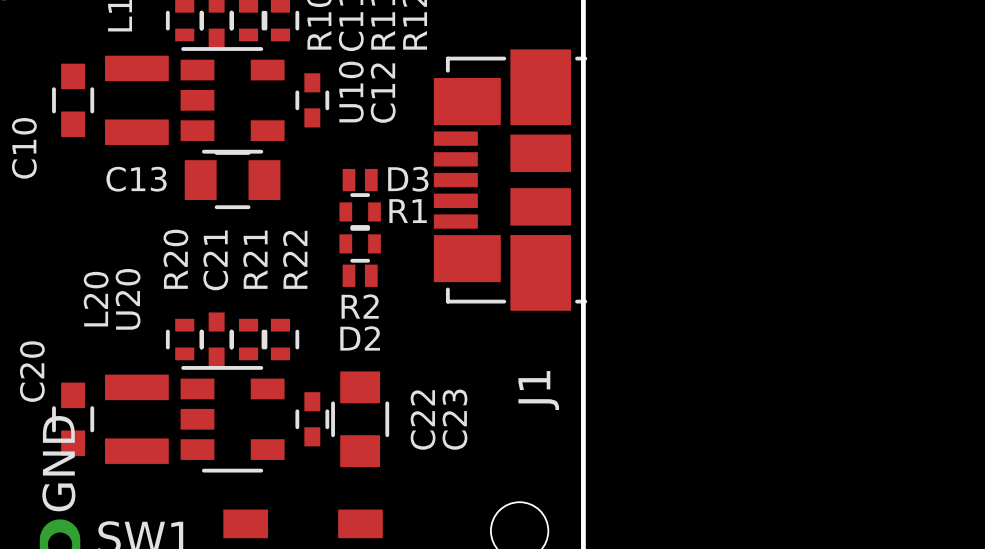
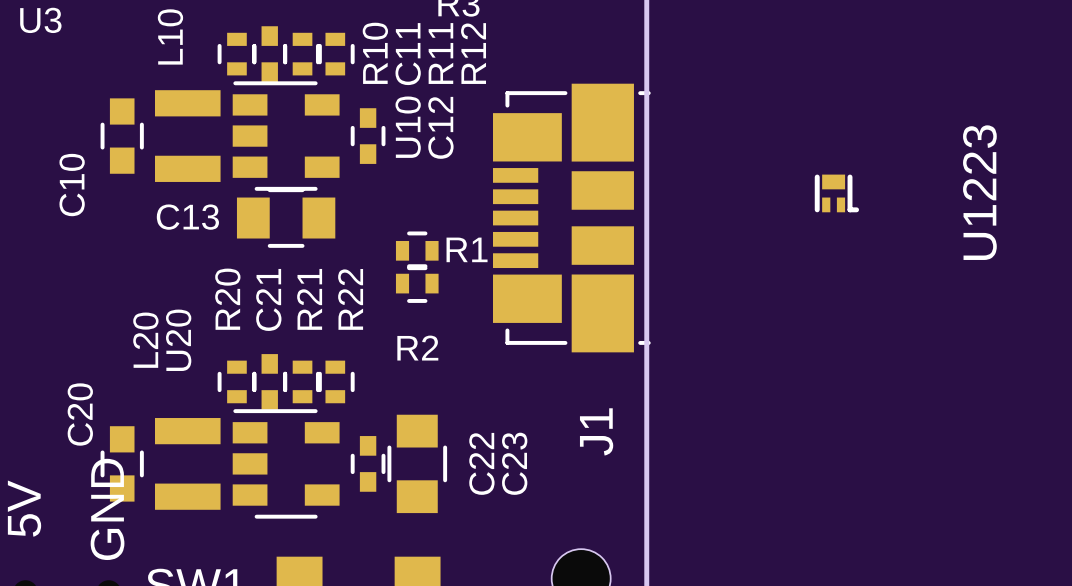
U1223: none -> (836, 193)
D3: (360, 180) -> none
D2: (360, 275) -> none

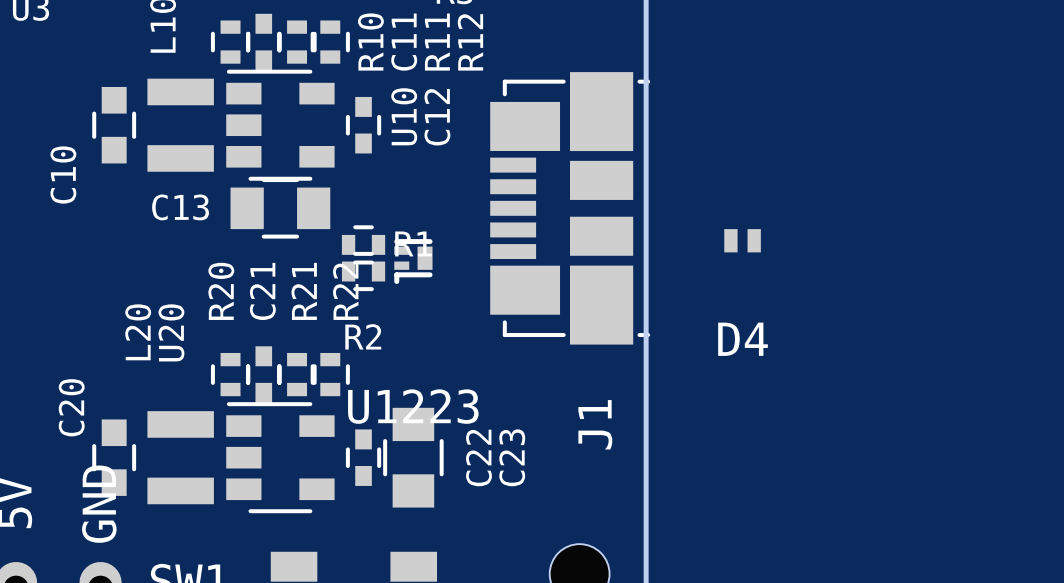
U1223 rotation: 0° (836, 193) -> 90° clockwise (413, 261)
U1223 position: (836, 193) -> (413, 261)
D4: none -> (742, 240)
R1 position: (417, 250) -> (363, 244)
R2 position: (417, 283) -> (363, 271)

